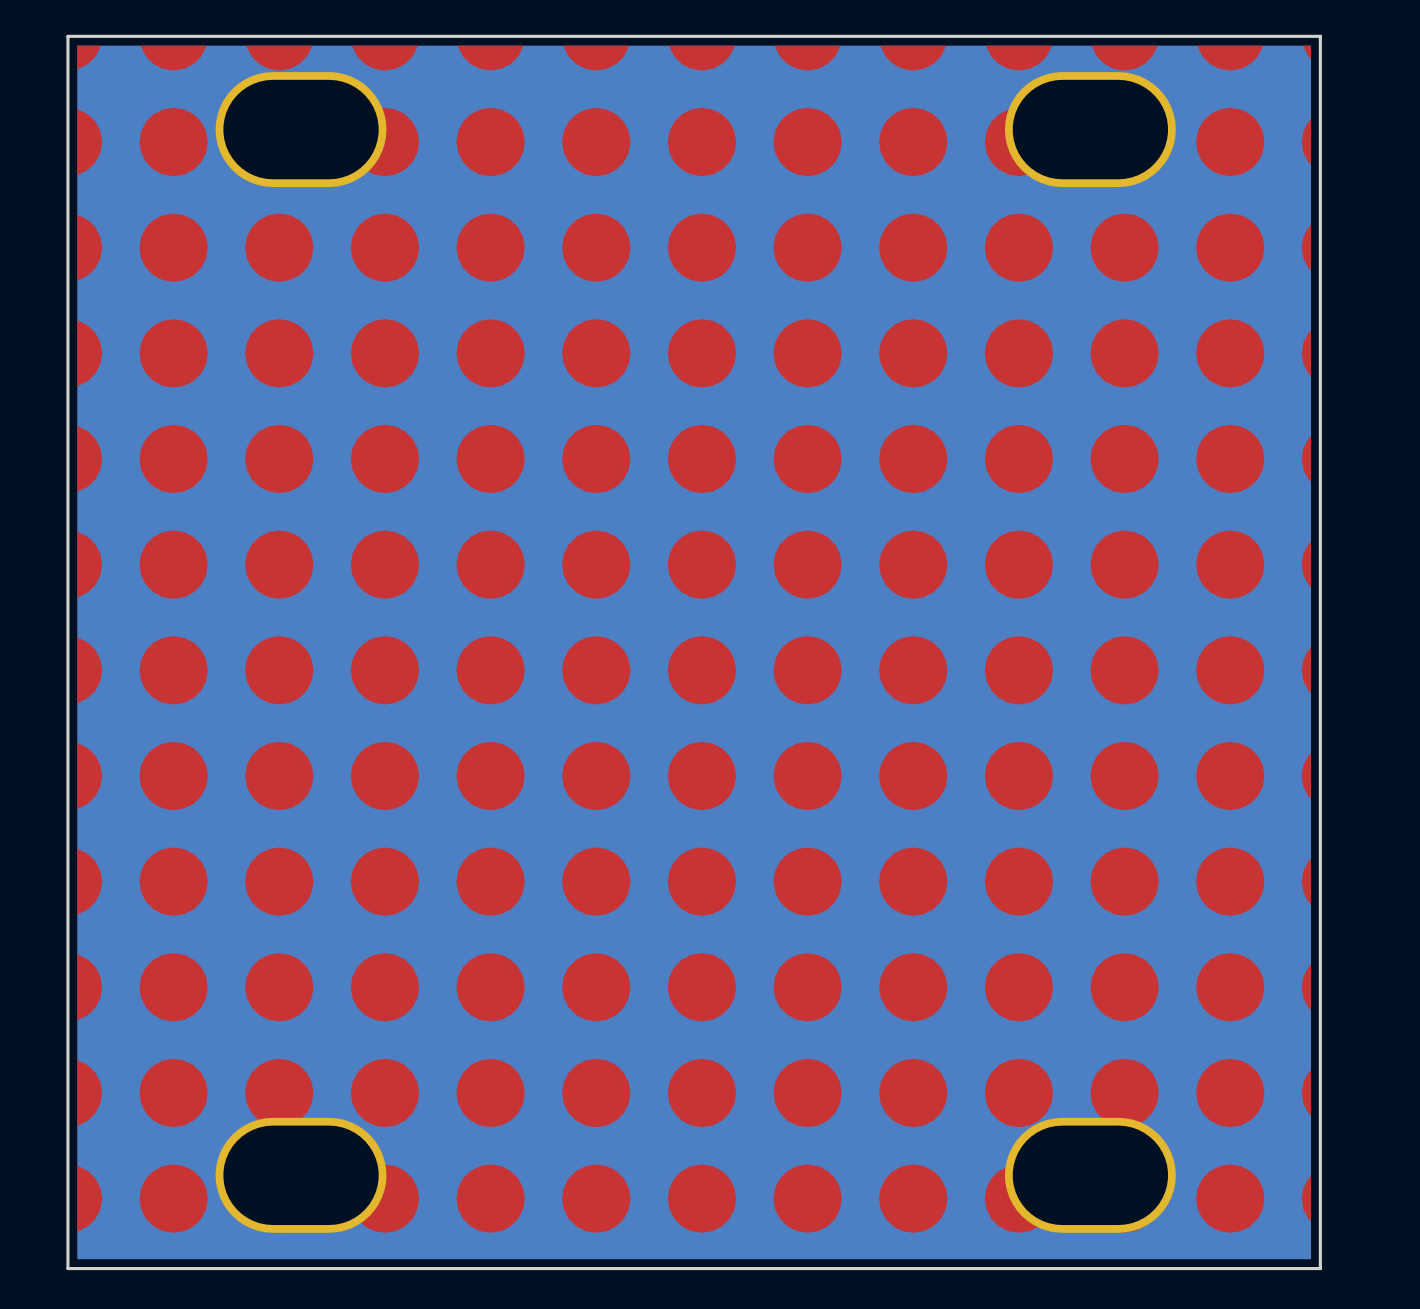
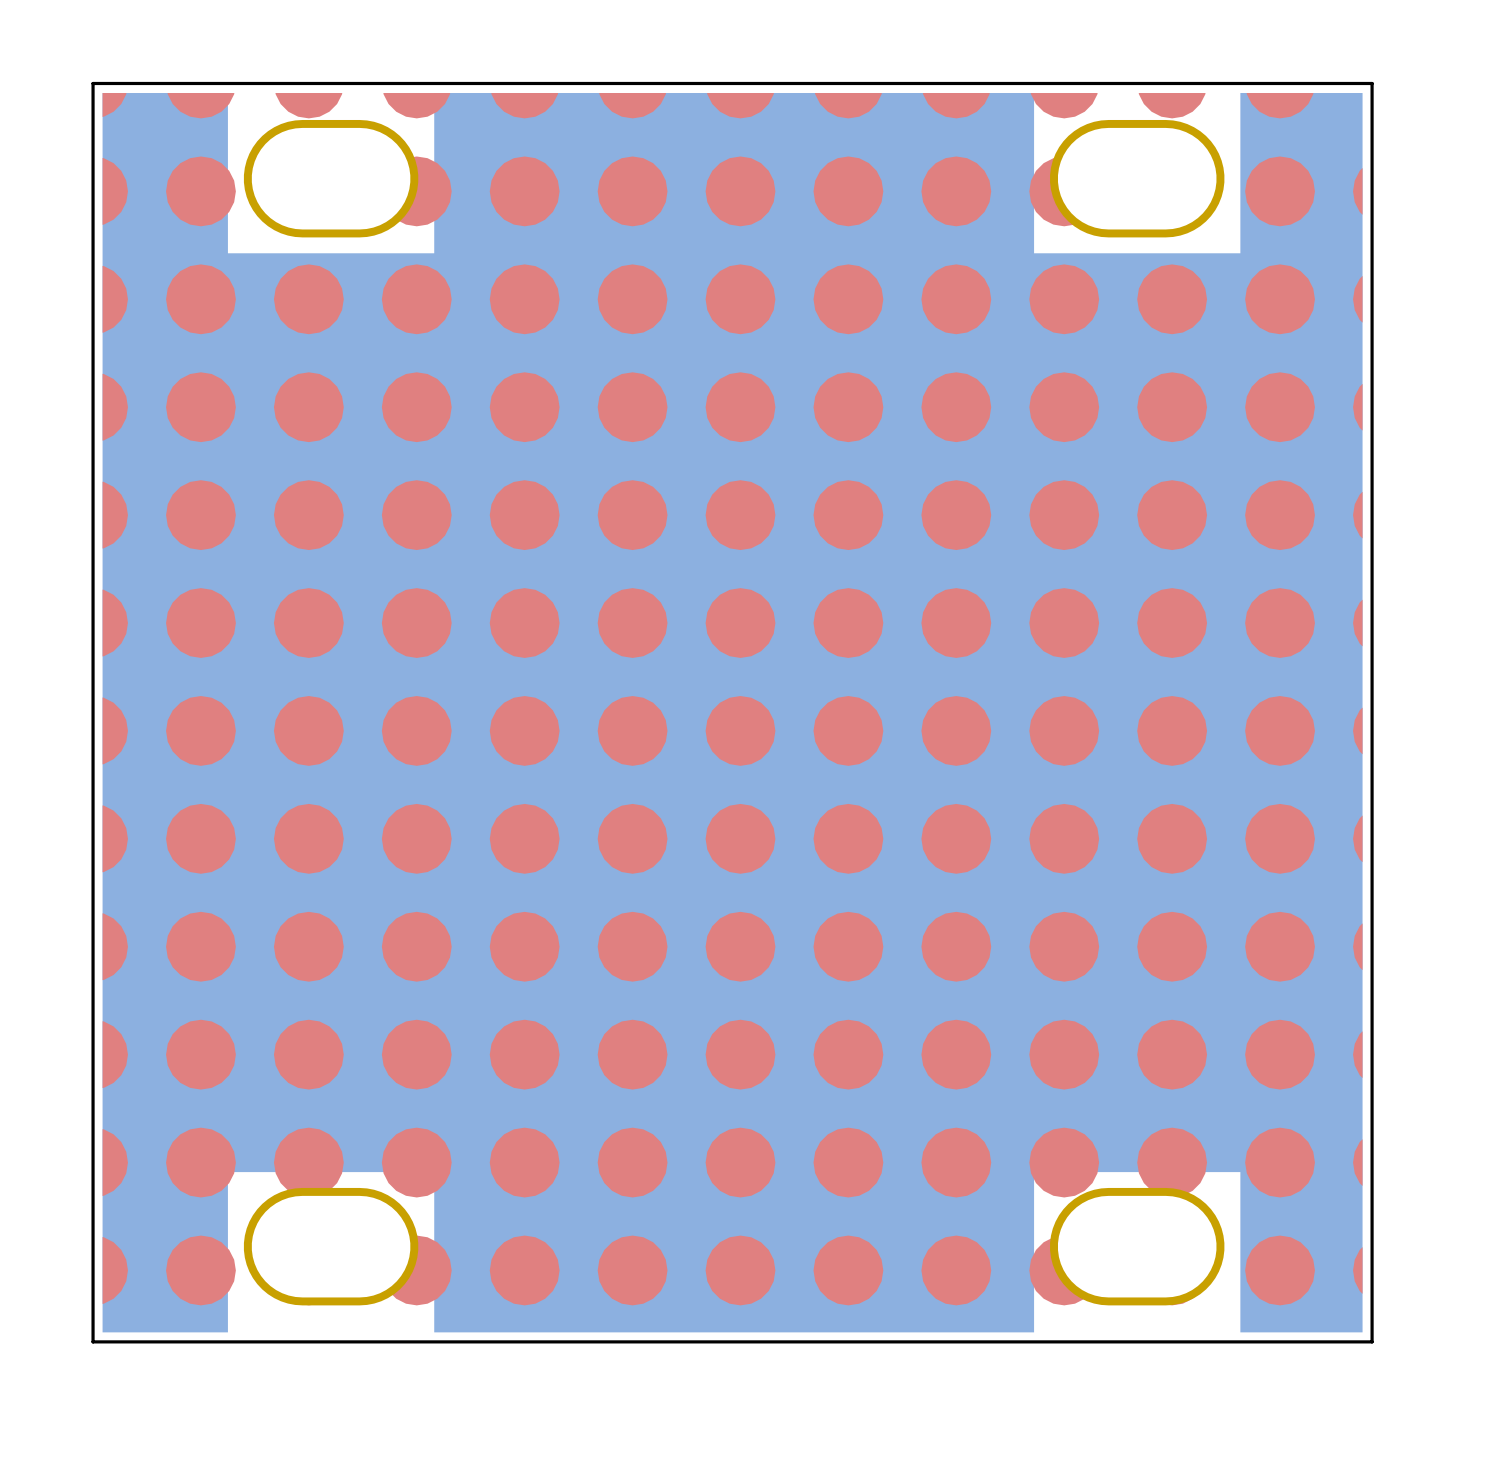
drawing shape: [77, 45, 1312, 1260] -> [227, 253, 1241, 1173]
drawing: none -> [102, 93, 228, 1333]
drawing: none -> [434, 93, 1035, 254]
drawing: none -> [1240, 93, 1363, 1333]
drawing: [1303, 45, 1312, 60] -> none
drawing: none -> [434, 1172, 1035, 1333]

